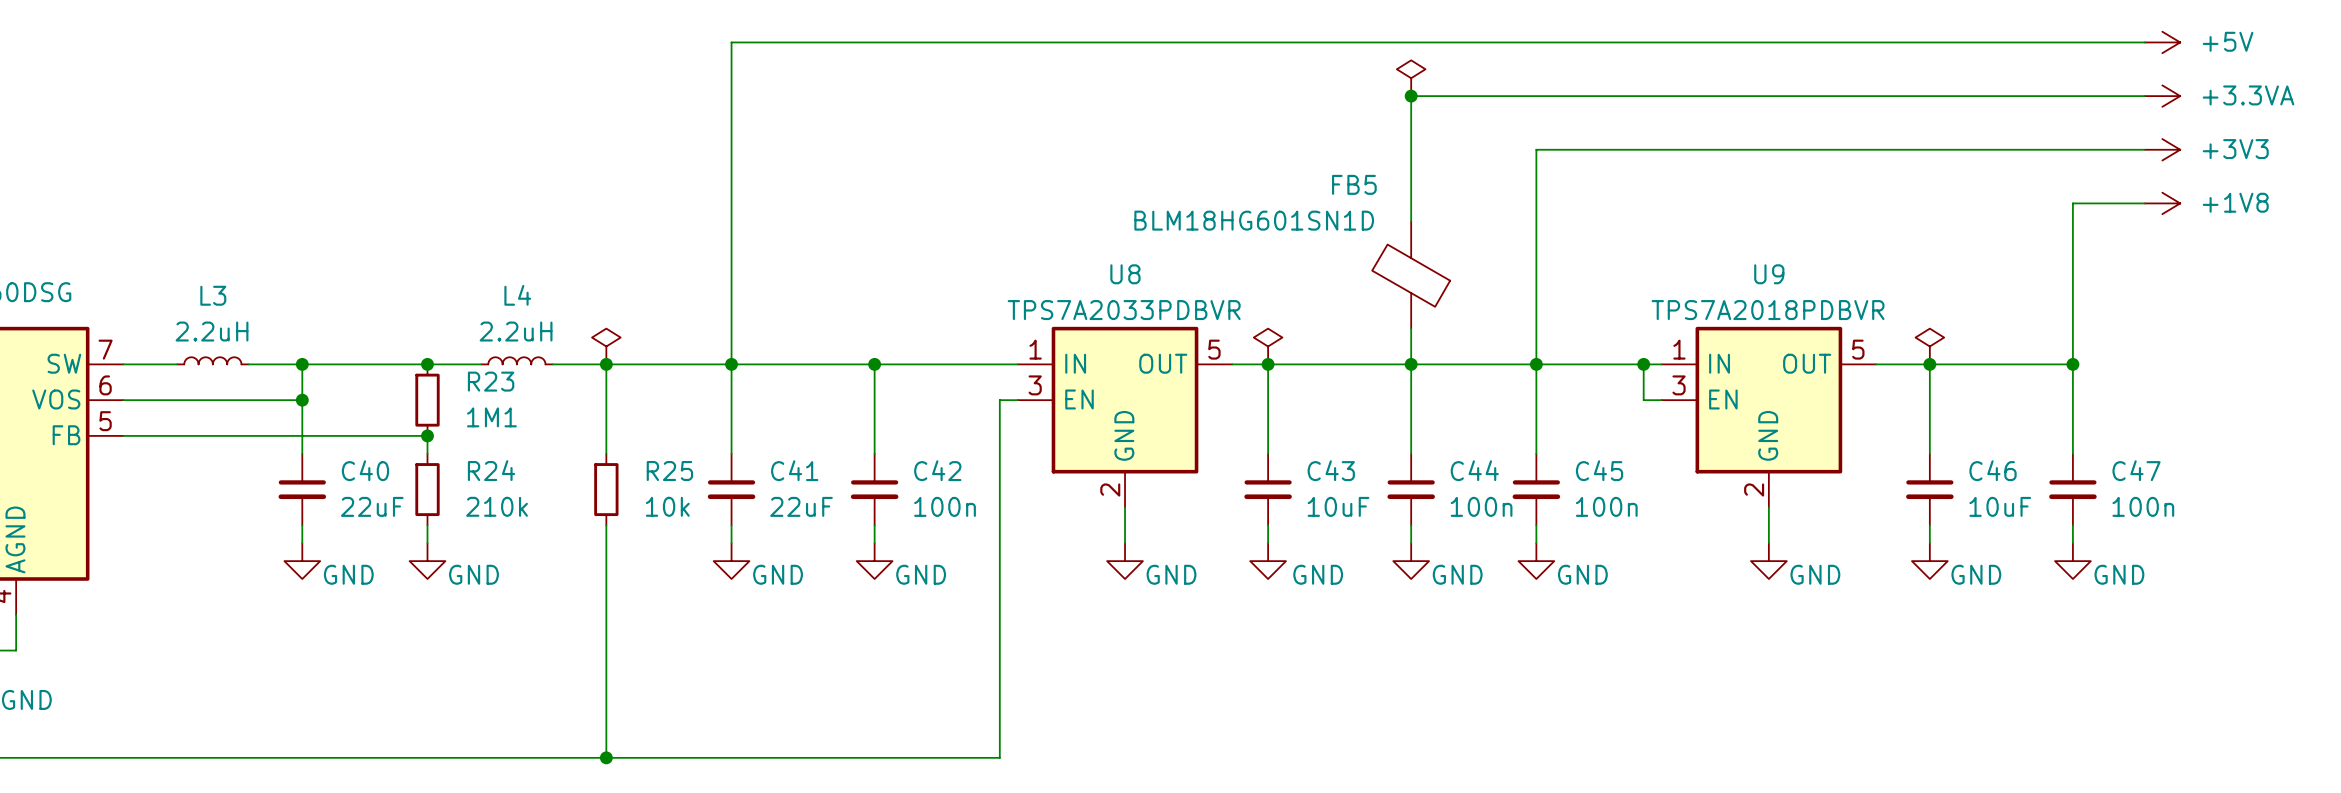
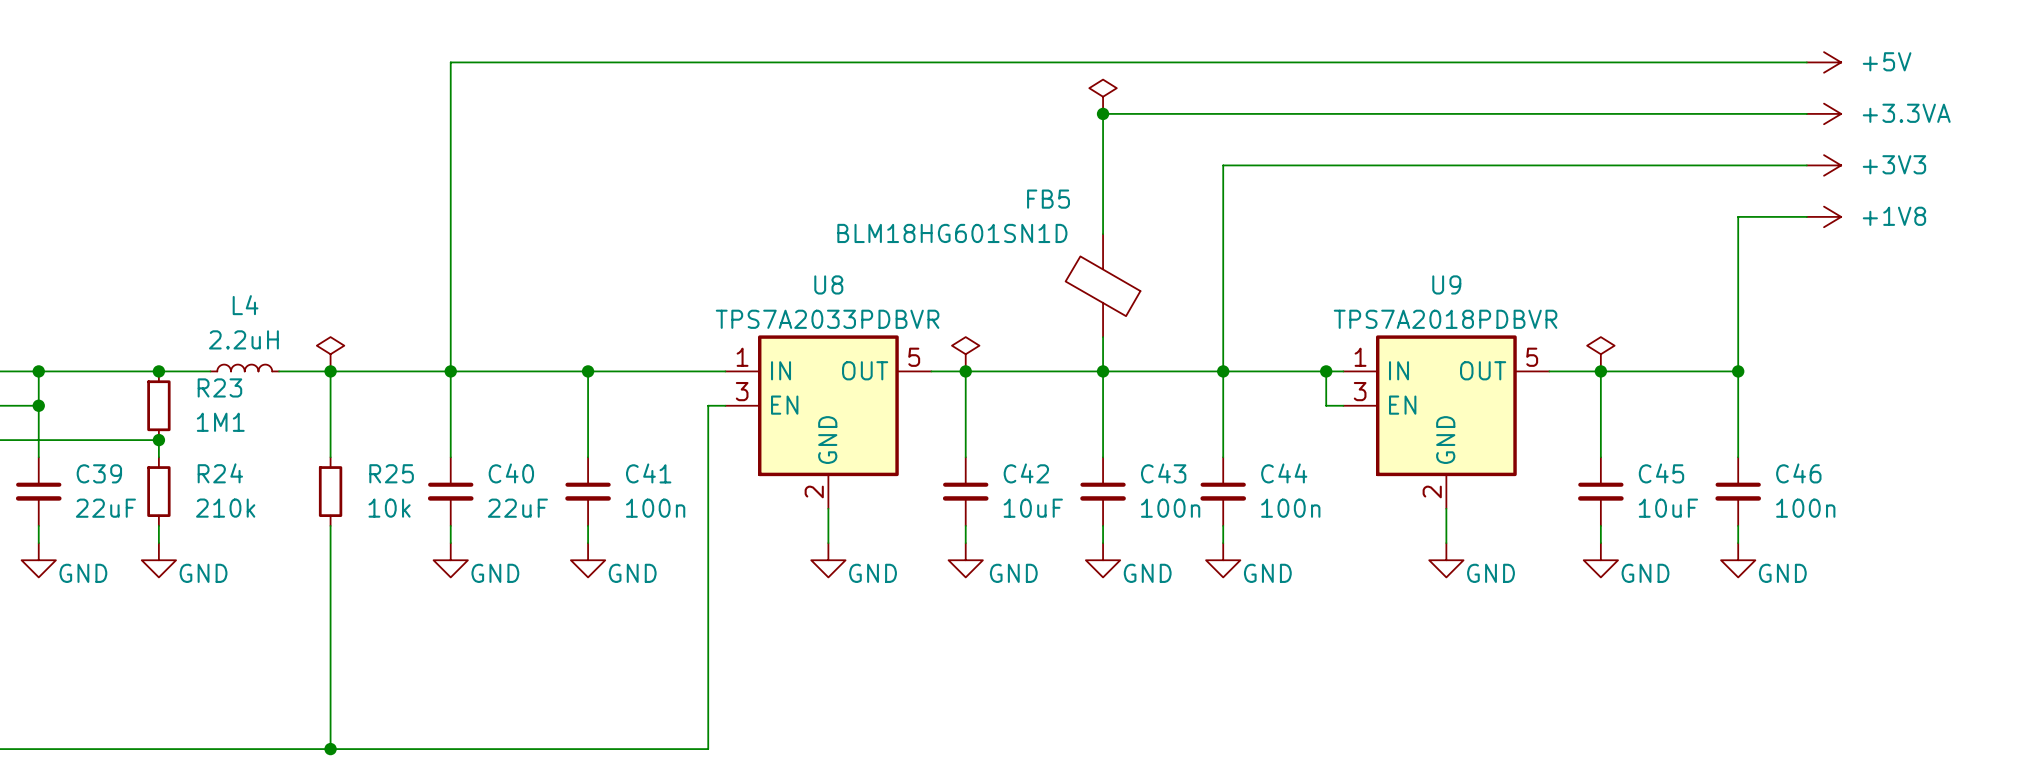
C40 name: C40 (365, 470) -> C39 (99, 473)
C41 name: C41 (794, 470) -> C40 (511, 473)
C42 name: C42 (937, 470) -> C41 (648, 473)
C43 name: C43 (1331, 470) -> C42 (1026, 473)
C44 name: C44 (1474, 470) -> C43 (1163, 473)
C45 name: C45 (1599, 470) -> C44 (1284, 473)
C46 name: C46 (1993, 470) -> C45 (1661, 473)
C47 name: C47 (2136, 470) -> C46 (1798, 473)

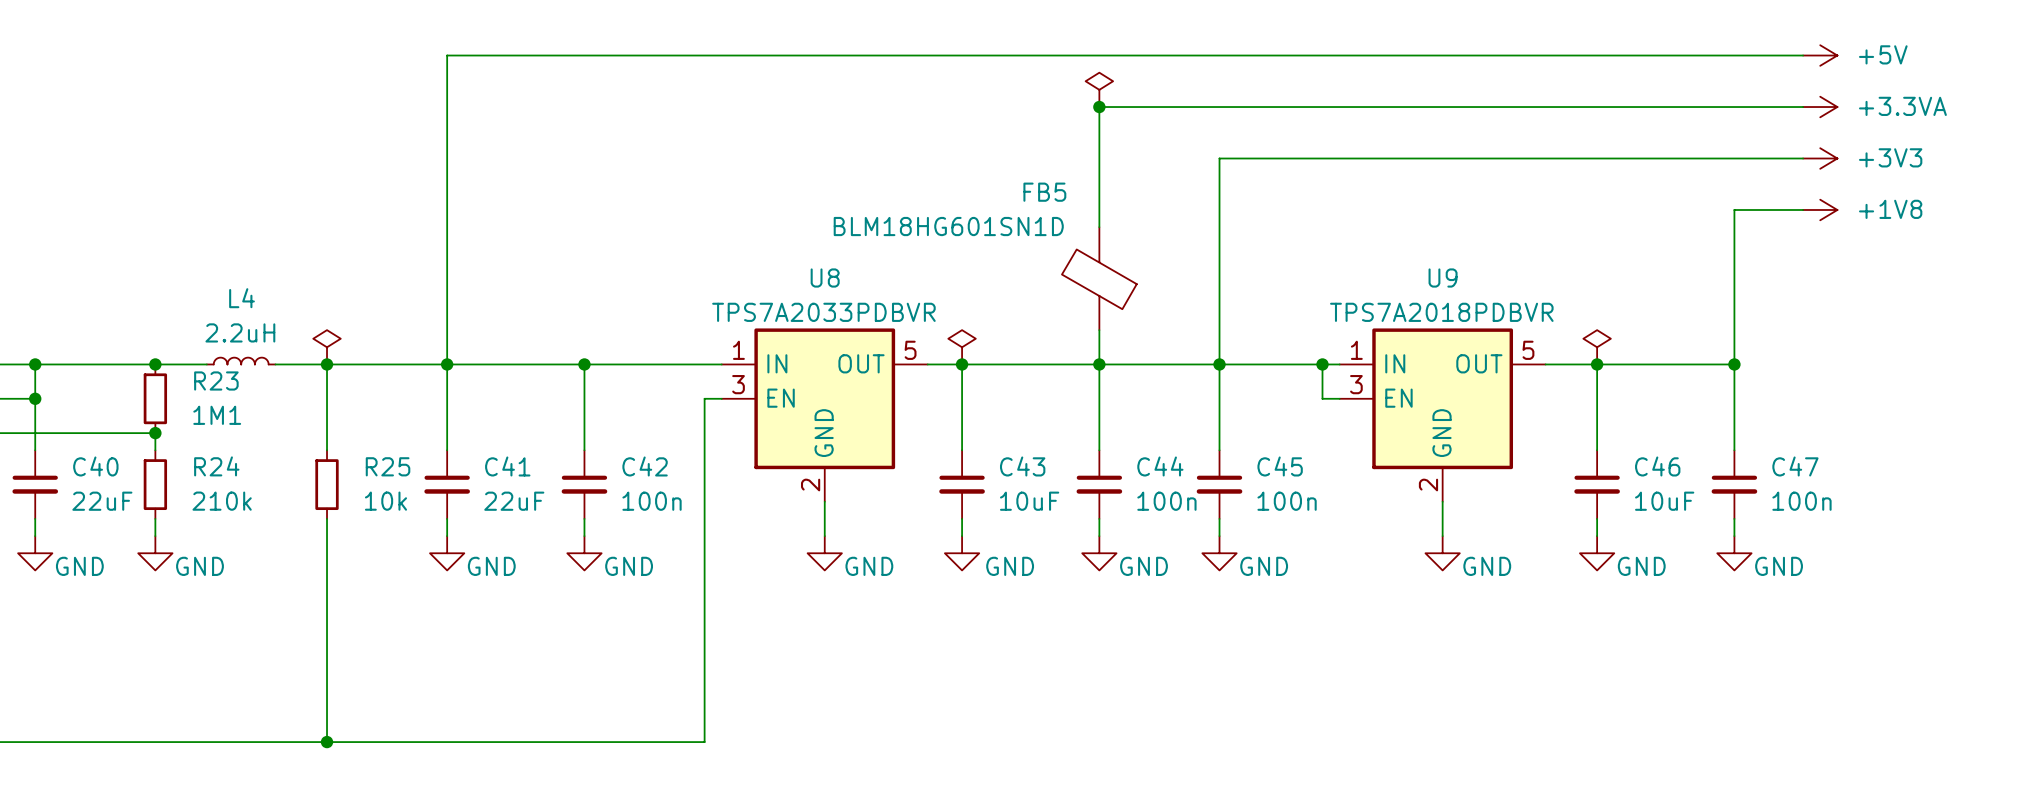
C39 name: C39 (99, 473) -> C40 (95, 466)
C40 name: C40 (511, 473) -> C41 (507, 466)
C41 name: C41 (648, 473) -> C42 (645, 466)
C42 name: C42 (1026, 473) -> C43 (1022, 466)
C43 name: C43 (1163, 473) -> C44 (1160, 466)
C44 name: C44 (1284, 473) -> C45 (1280, 466)
C45 name: C45 (1661, 473) -> C46 (1657, 466)
C46 name: C46 (1798, 473) -> C47 (1795, 466)

